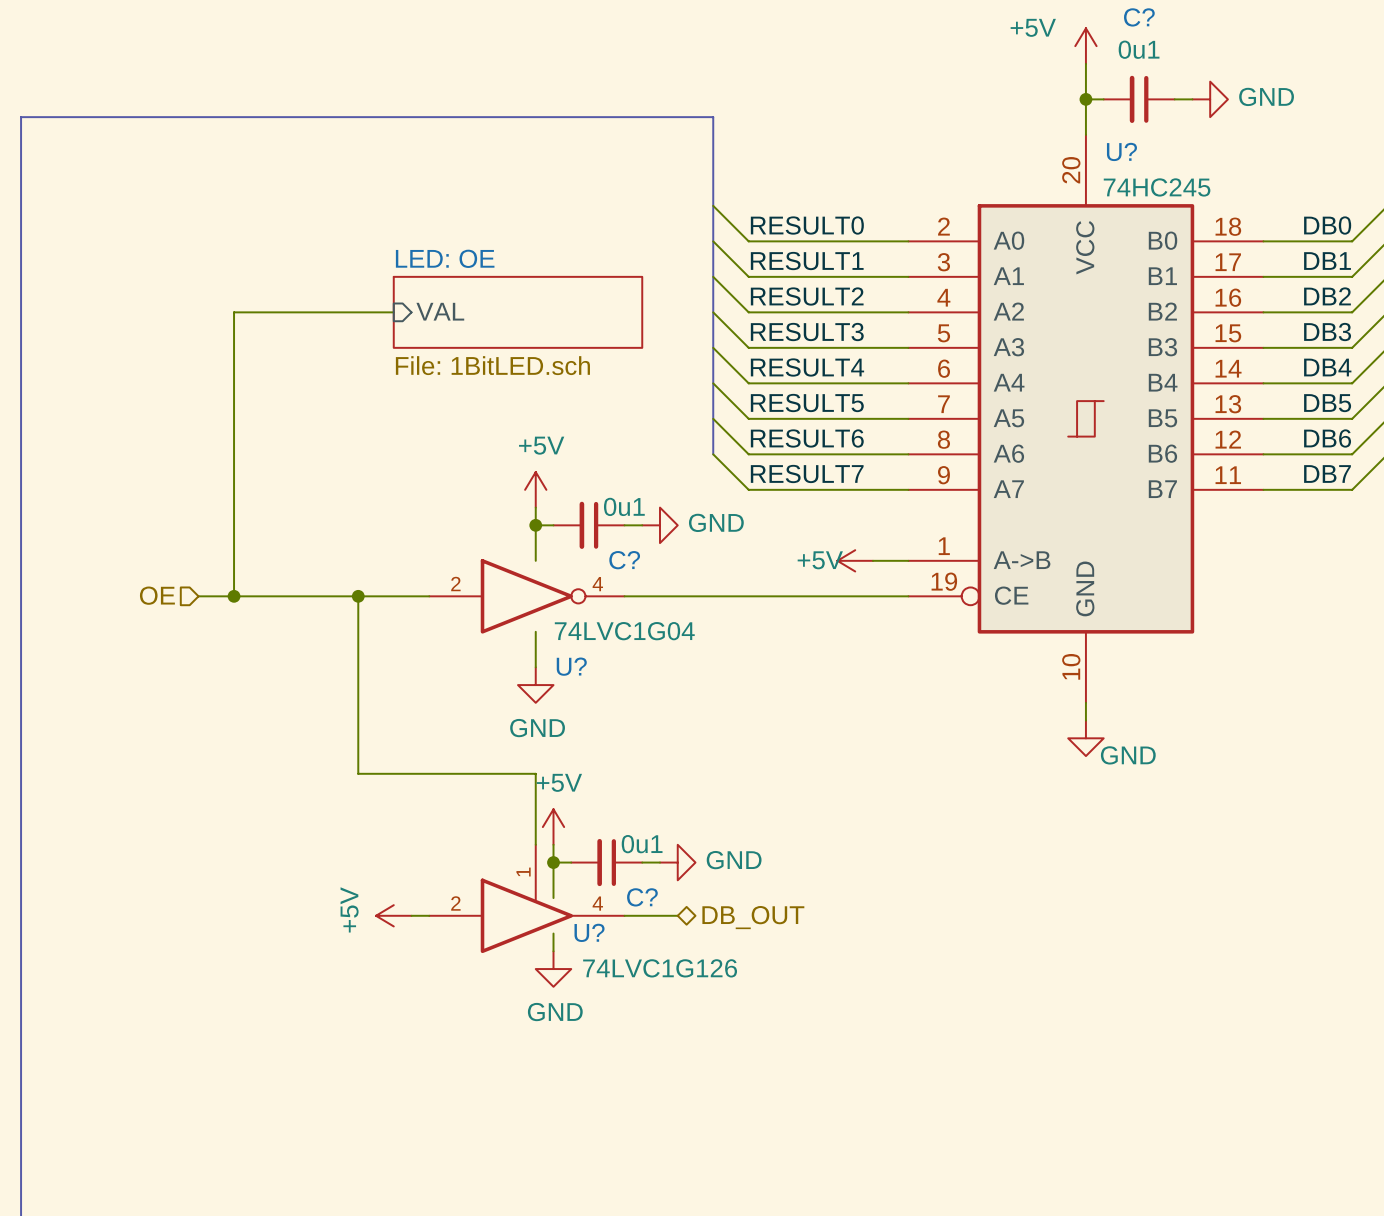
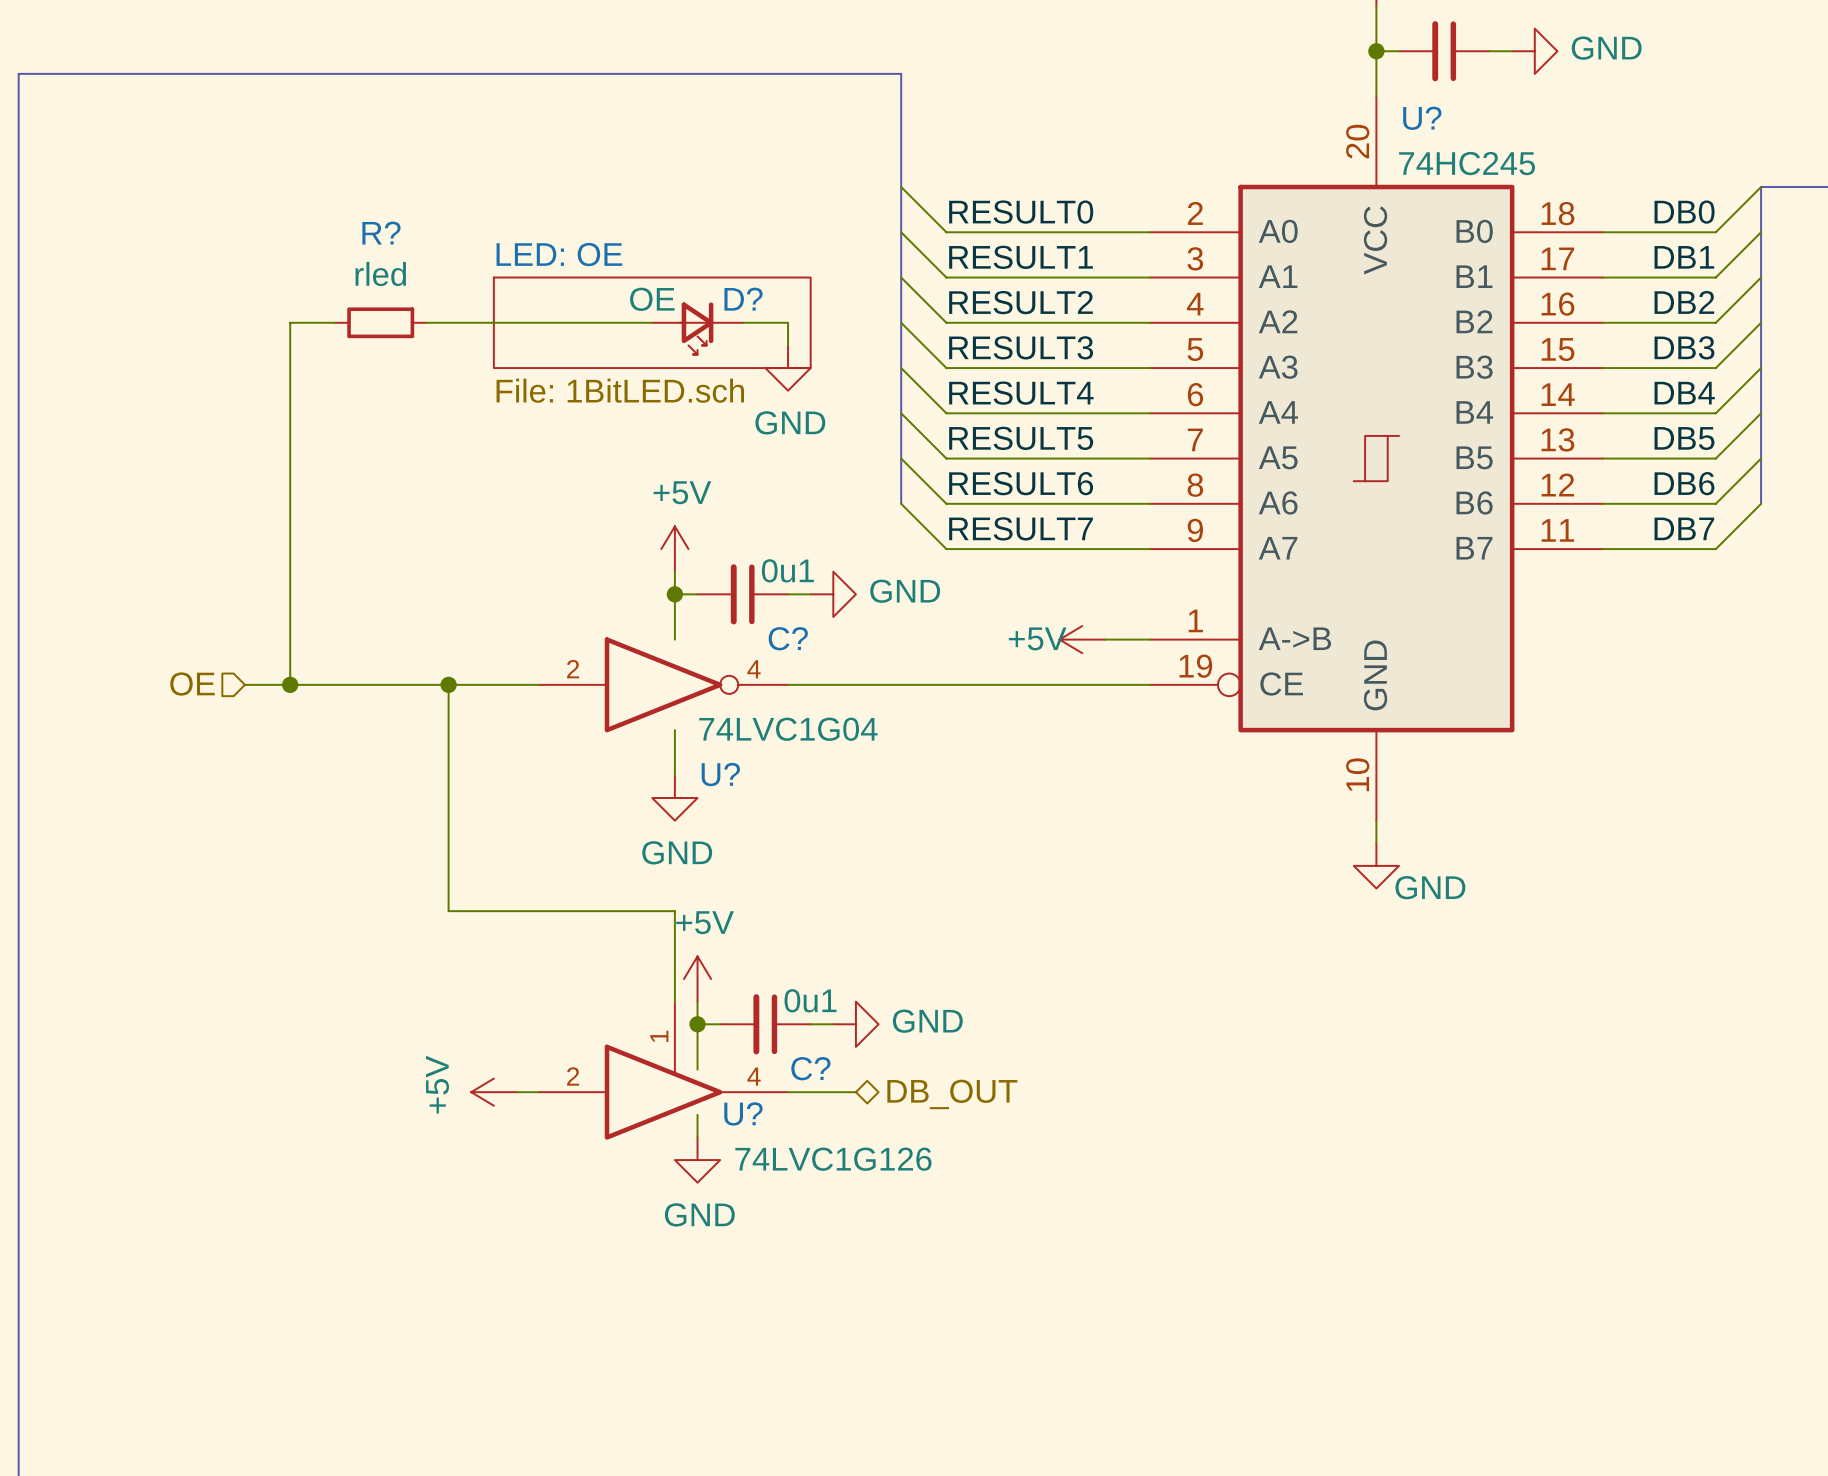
sheet pin: VAL (440, 311) -> none
wire: (269, 312) (340, 312) -> none
R?: none -> rled (380, 322)
wire: none -> (493, 322) (652, 322)
wire: none -> (742, 322) (788, 322) (788, 345)
D?: none -> OE (697, 328)
power symbol: none -> GND (788, 368)

